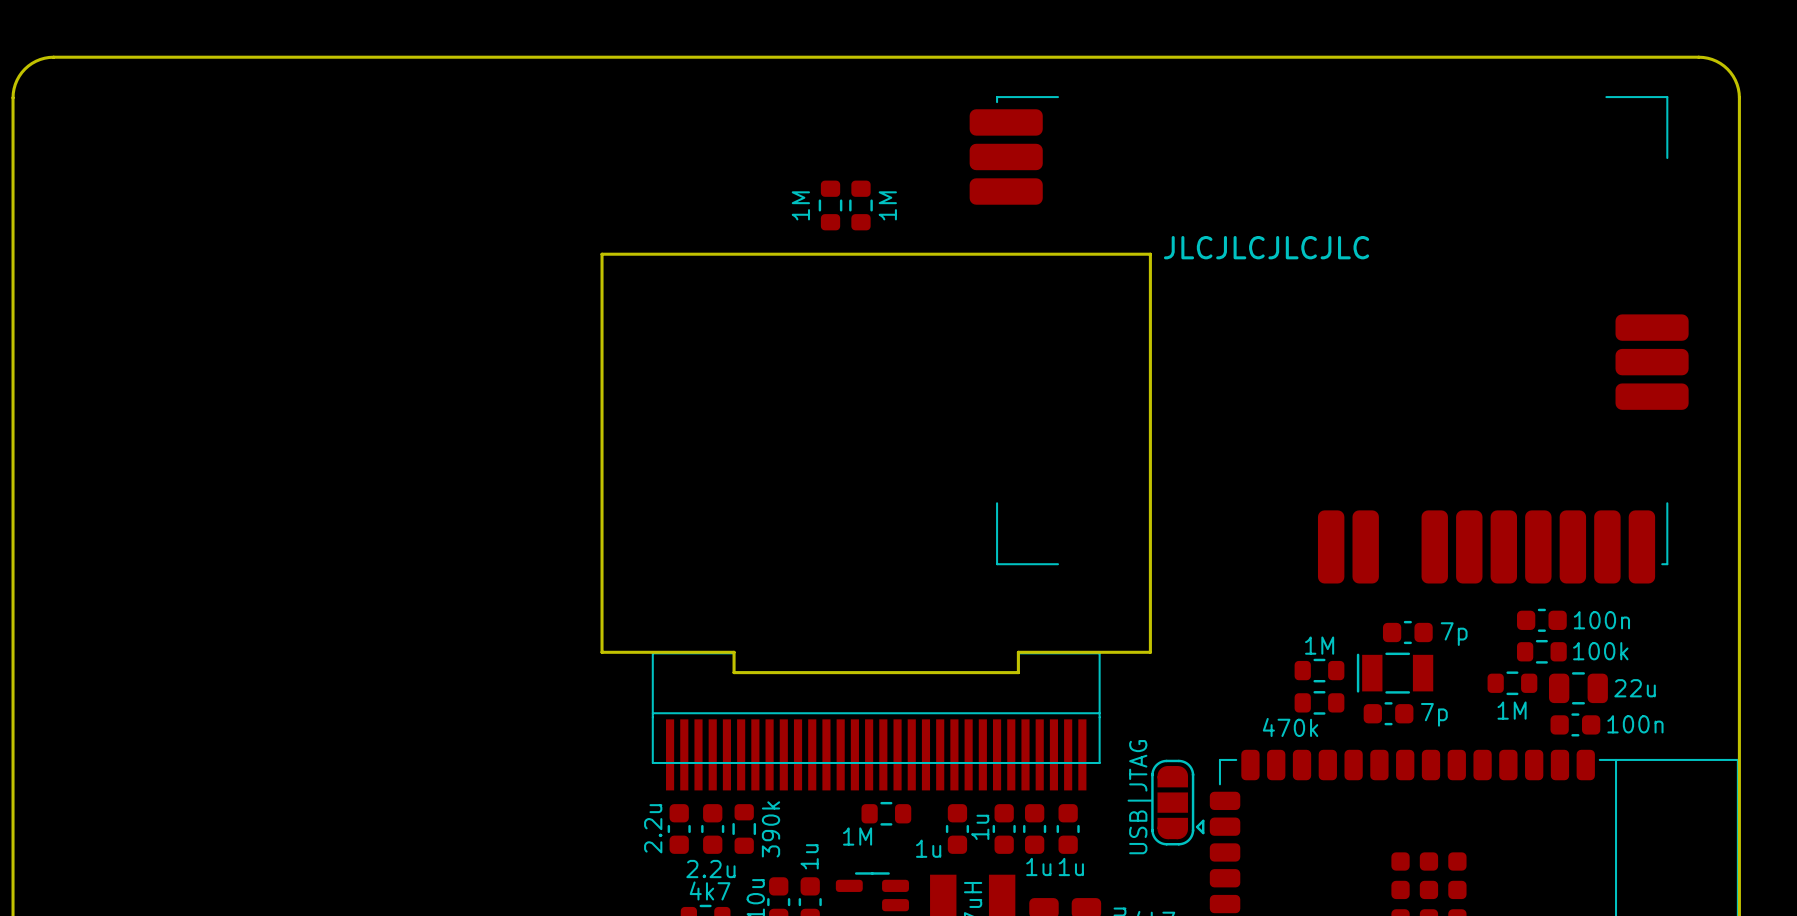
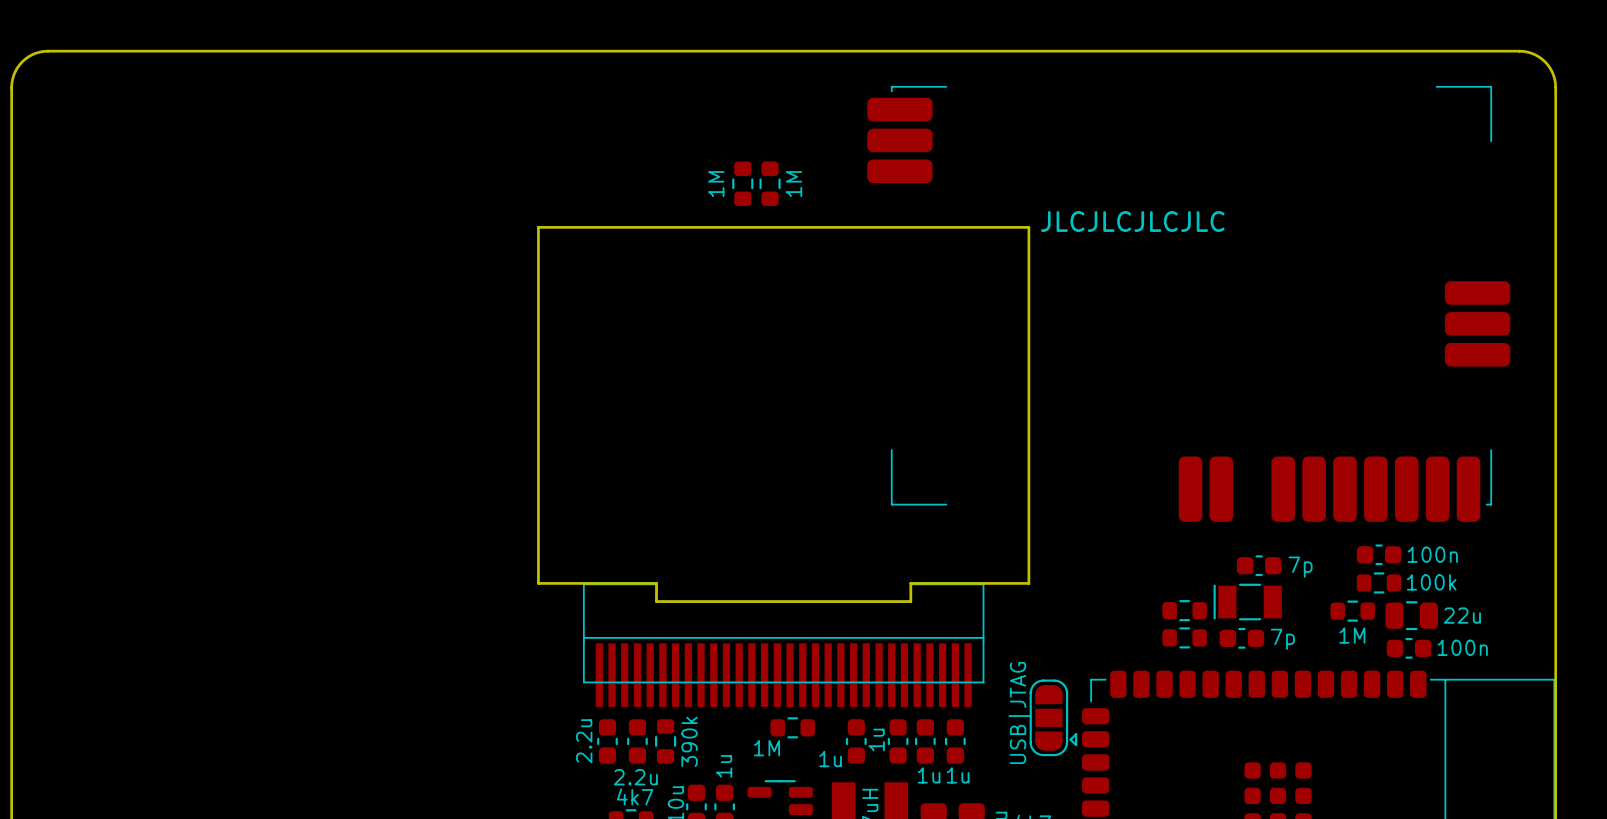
part: 1M (1319, 670) -> none
part: none -> (1184, 610)
part: 470k (1319, 702) -> none
part: none -> (1184, 637)

